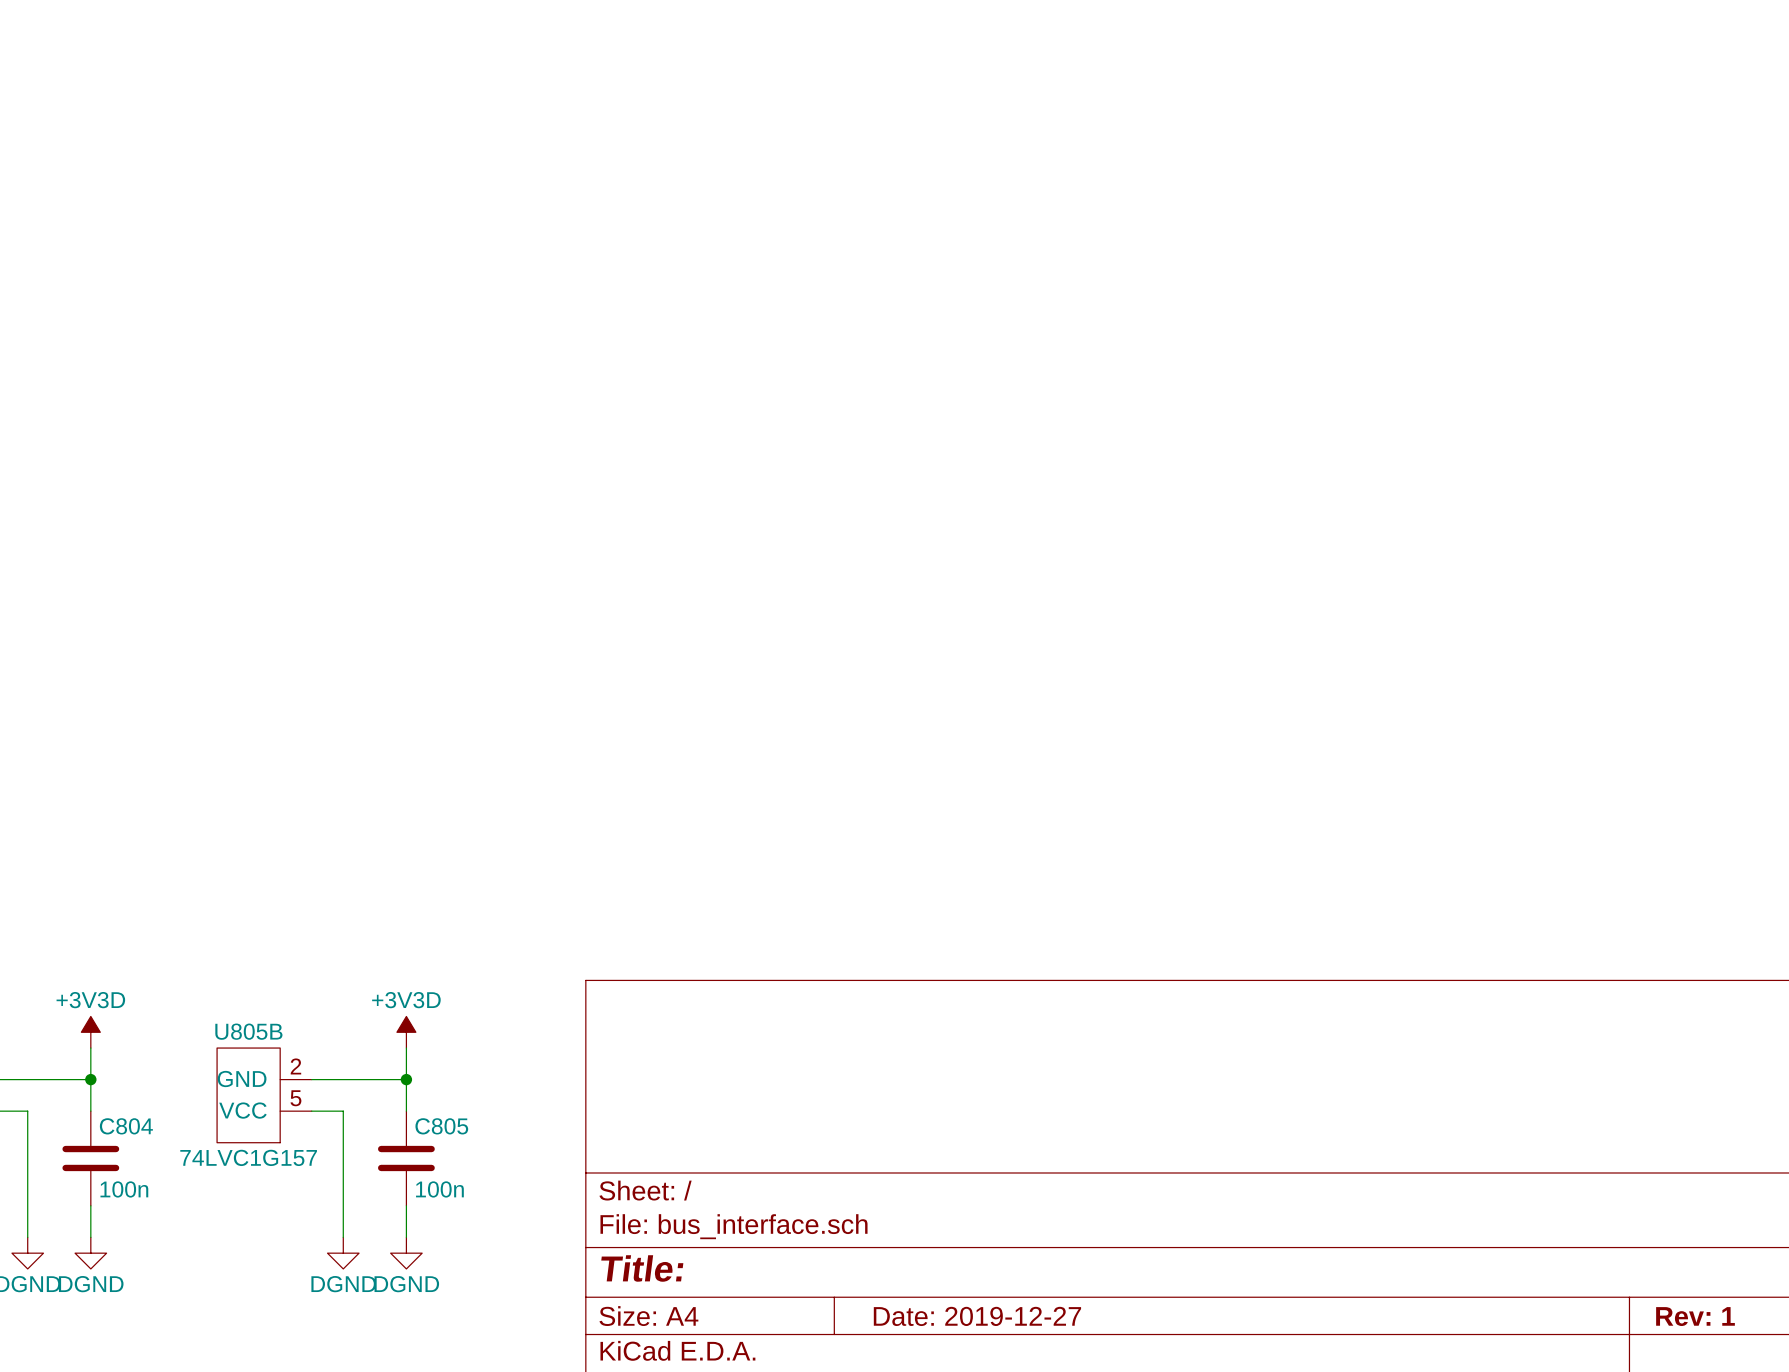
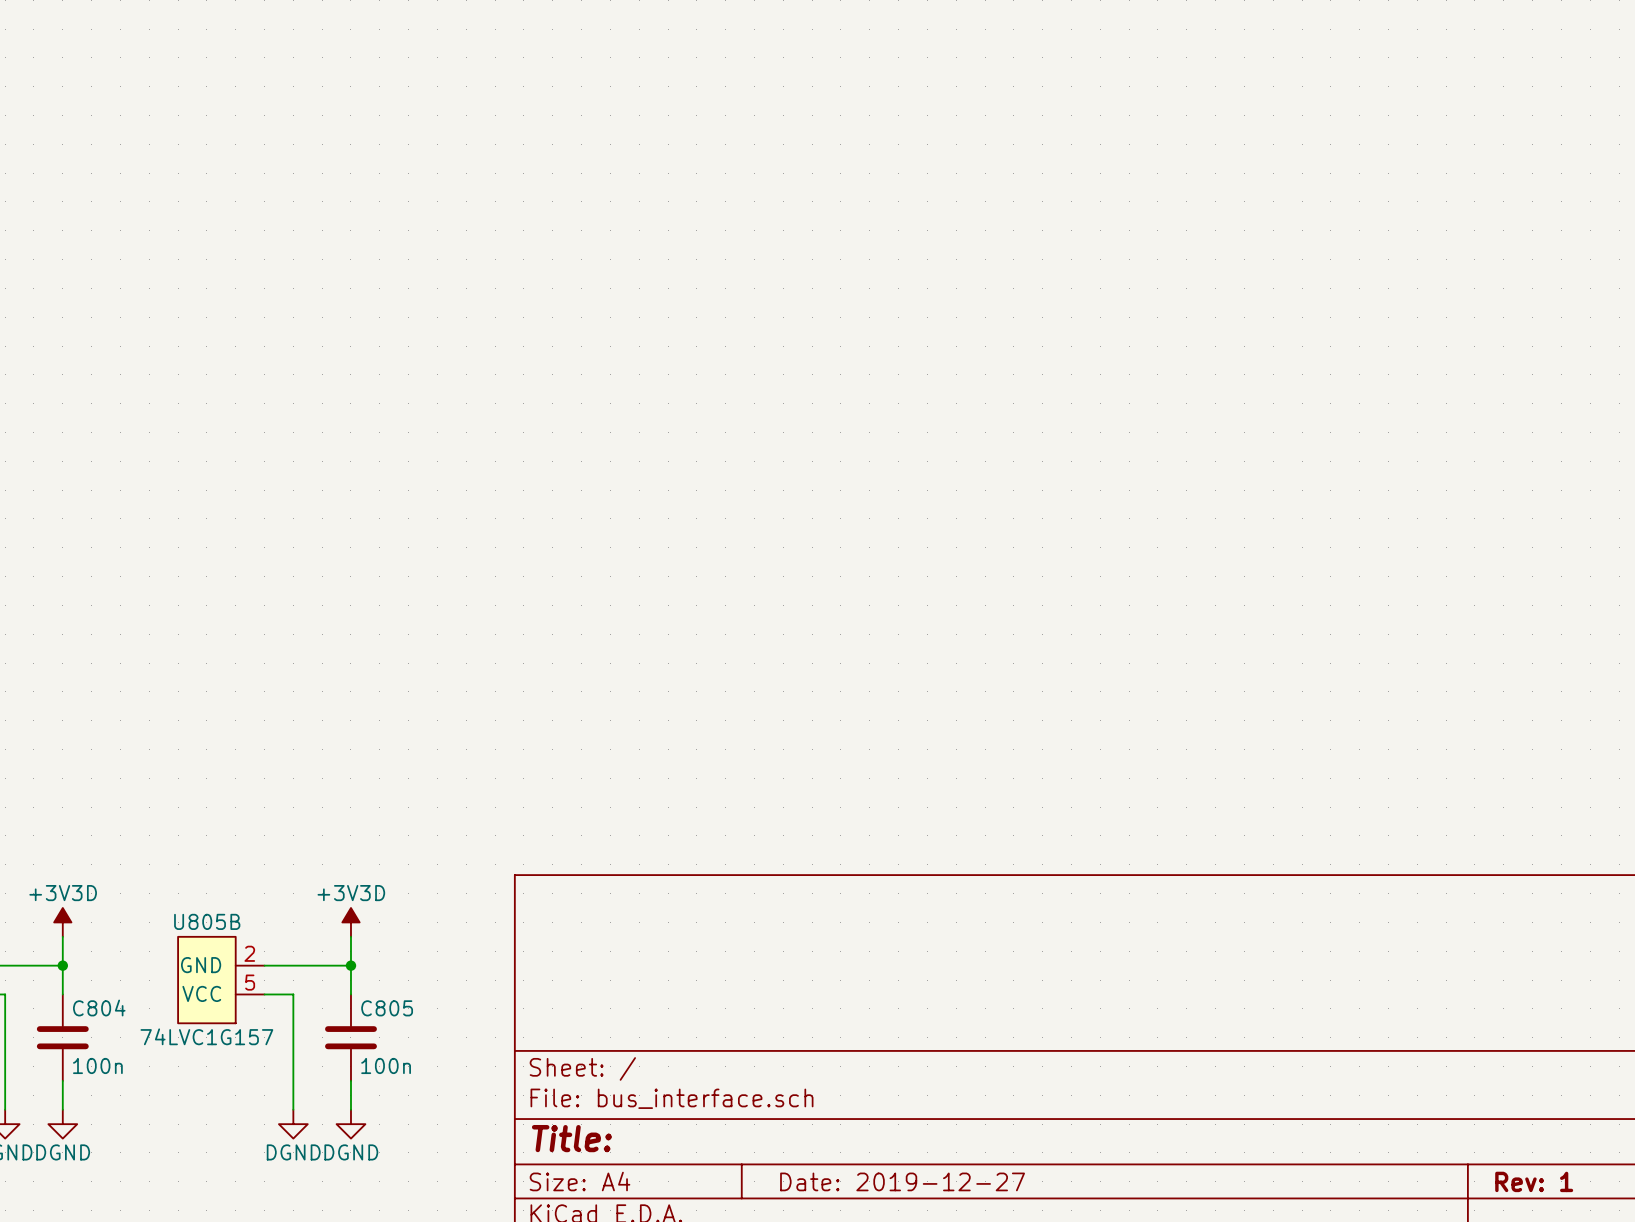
U805B symbol: [217, 1048, 312, 1143] -> [178, 936, 265, 1024]

